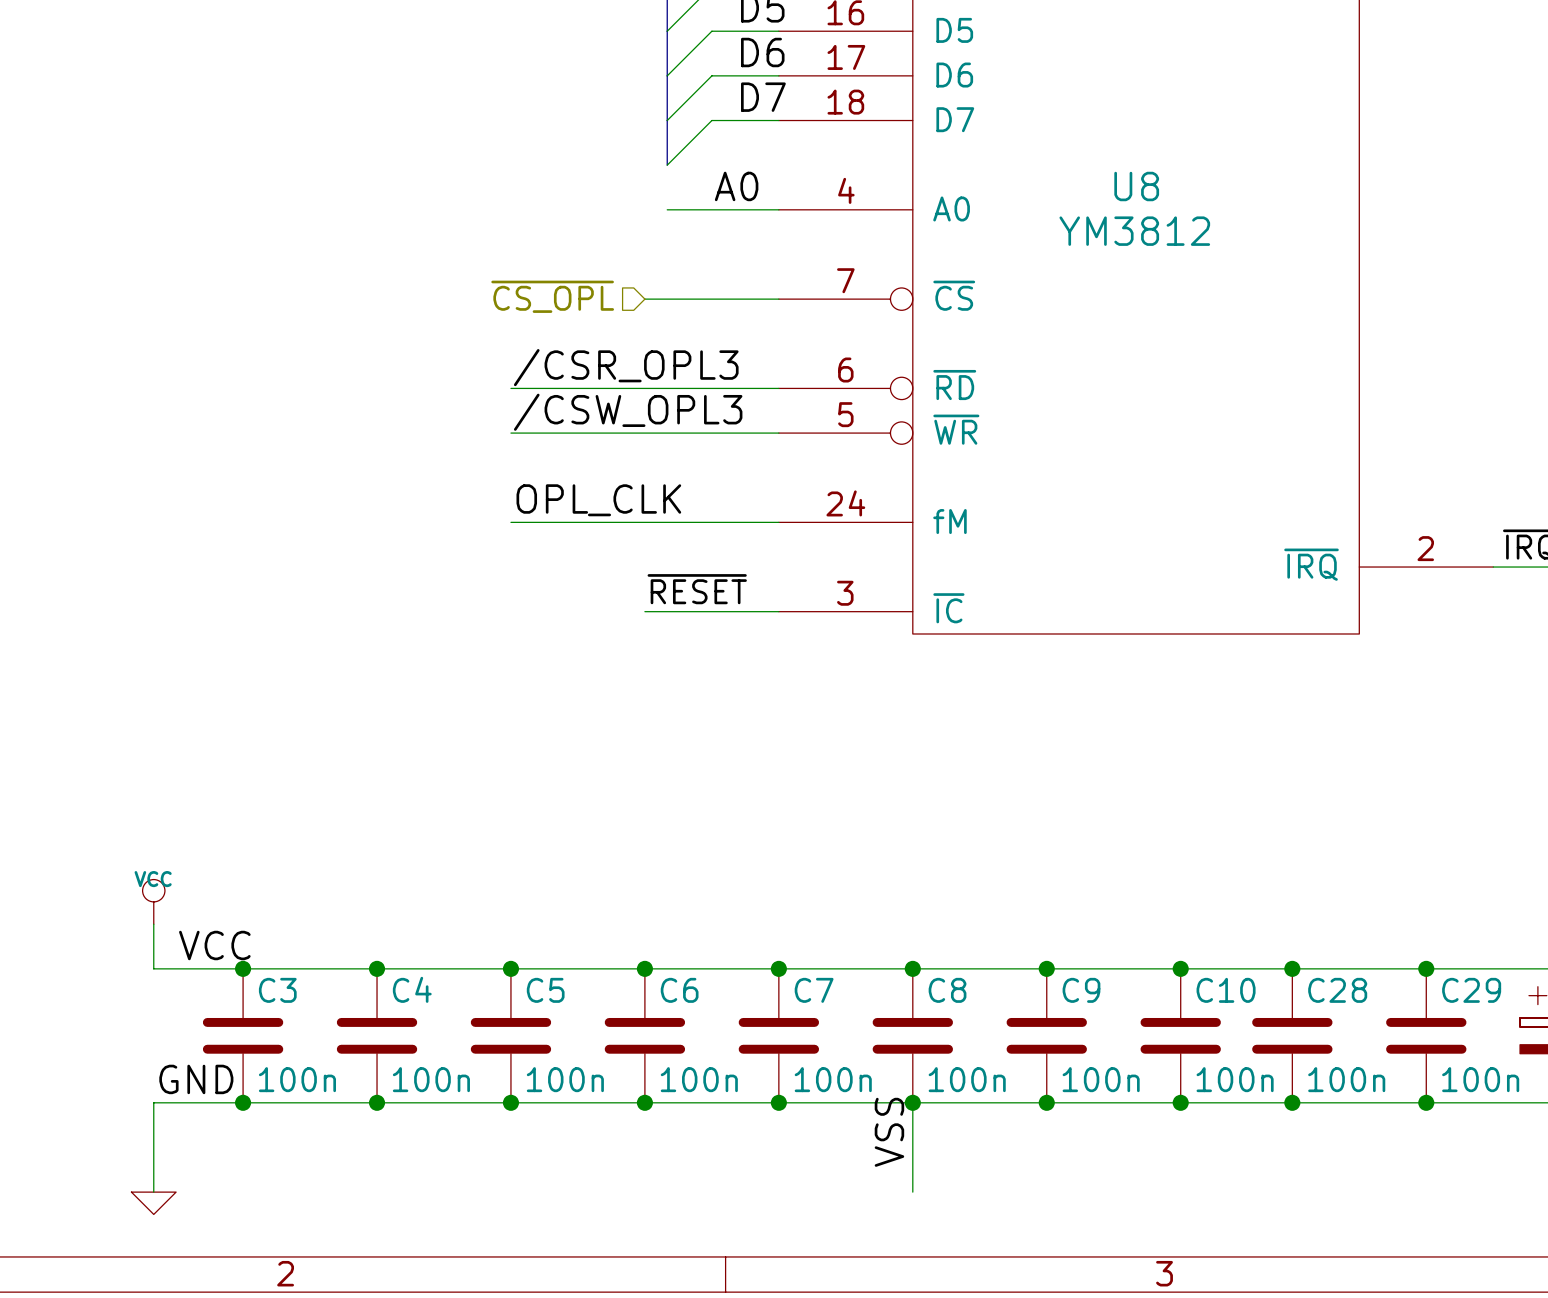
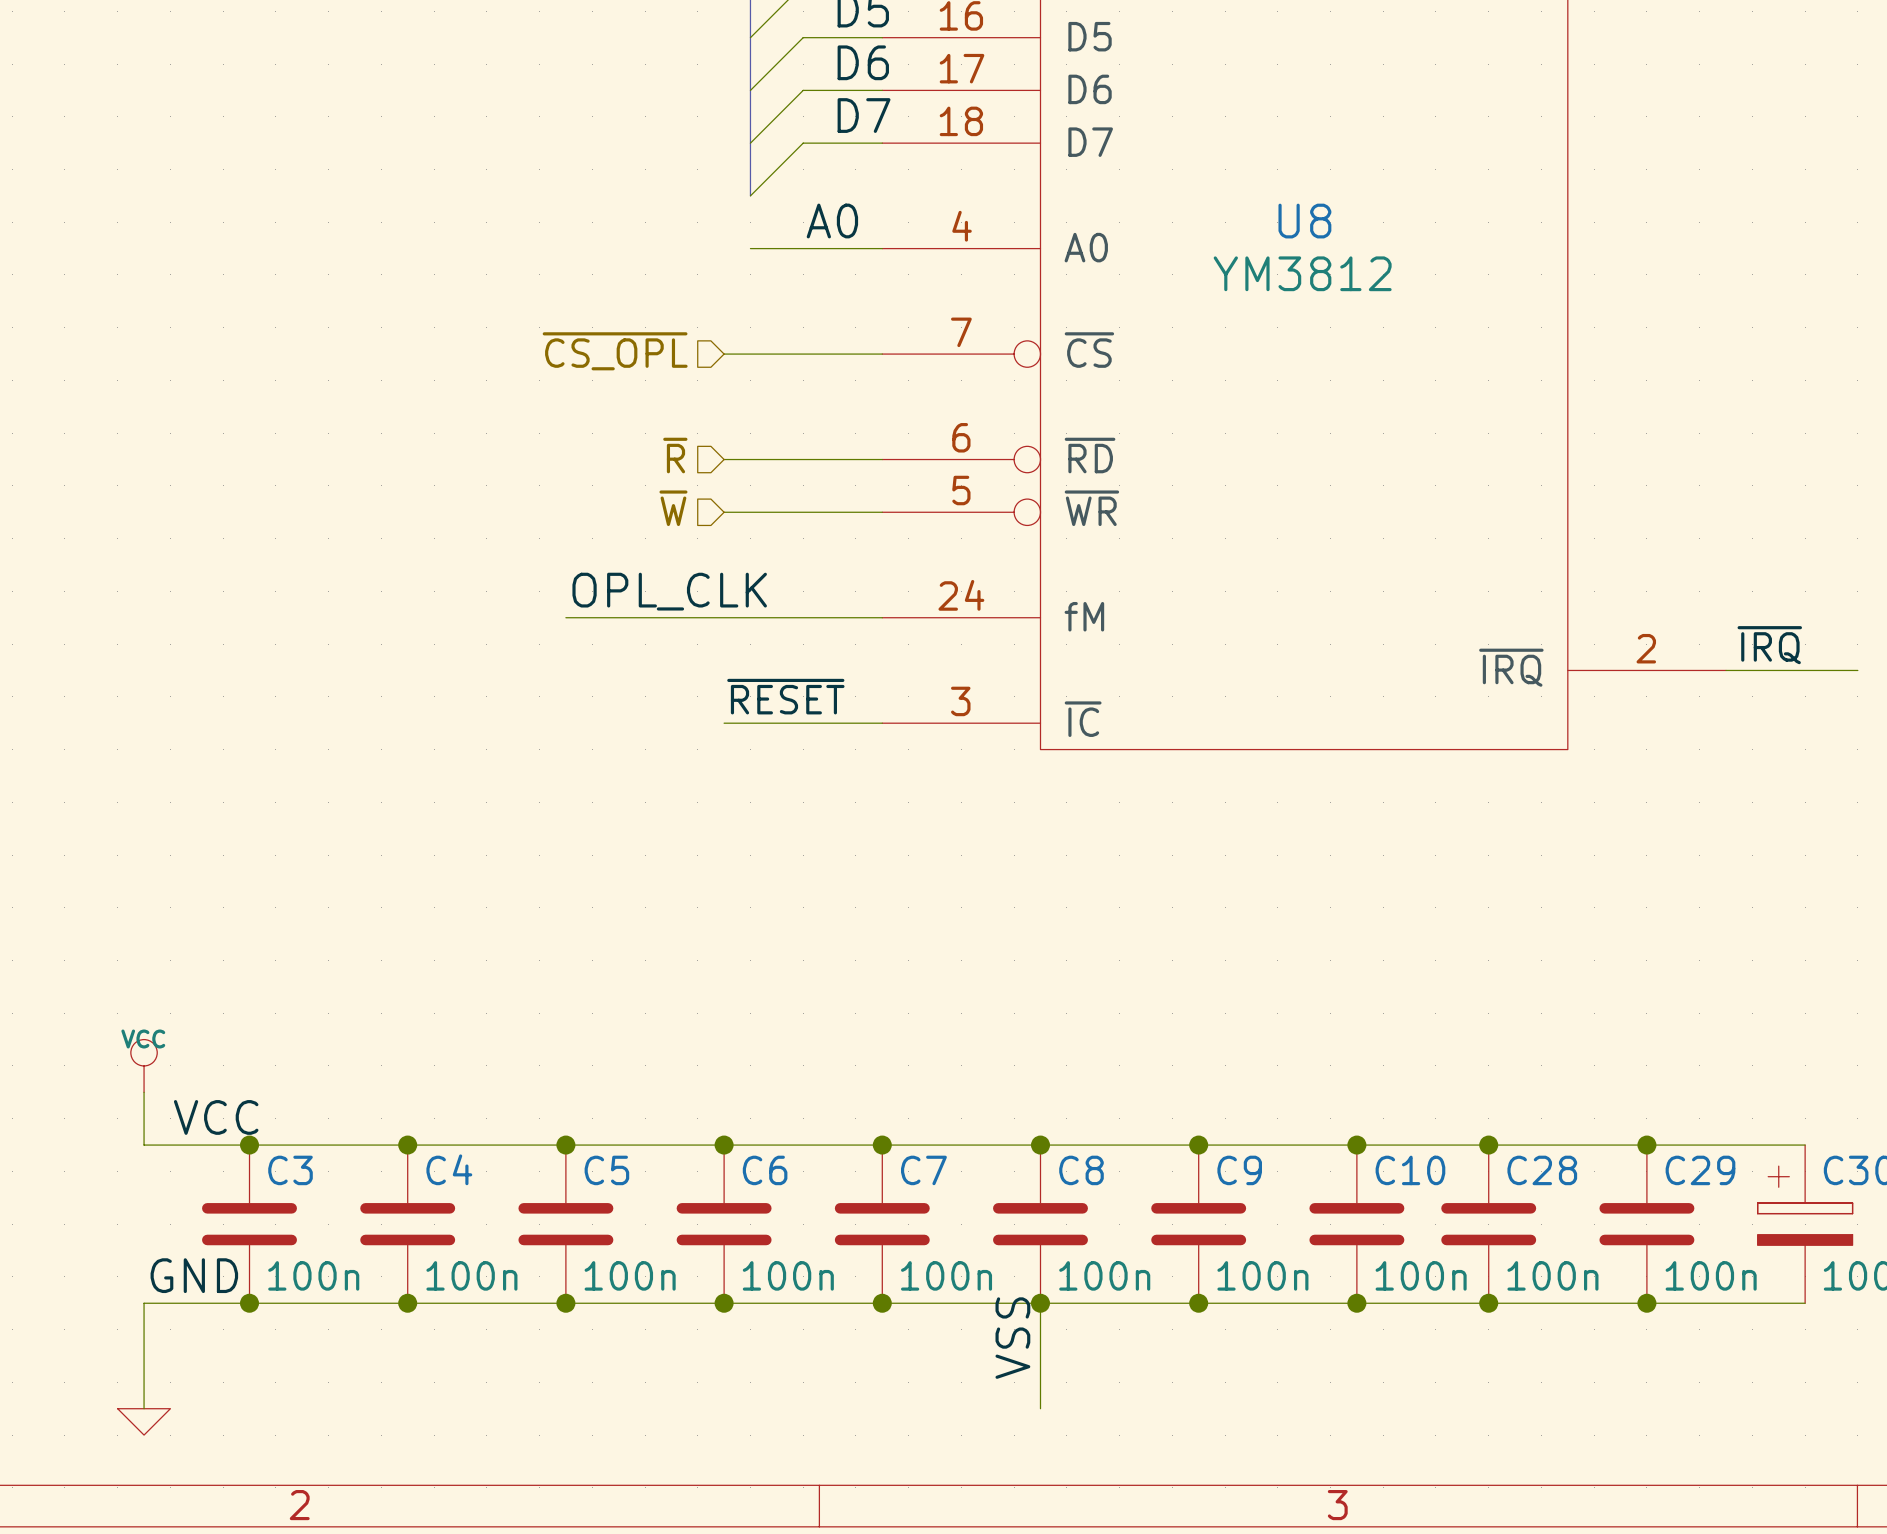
label: /CSR_OPL3 (626, 367) -> none
hierarchical label: none -> ~{R} (675, 455)
wire: (510, 388) (644, 388) -> none
label: /CSW_OPL3 (628, 412) -> none
hierarchical label: none -> ~{W} (673, 508)
wire: (510, 433) (644, 433) -> none

